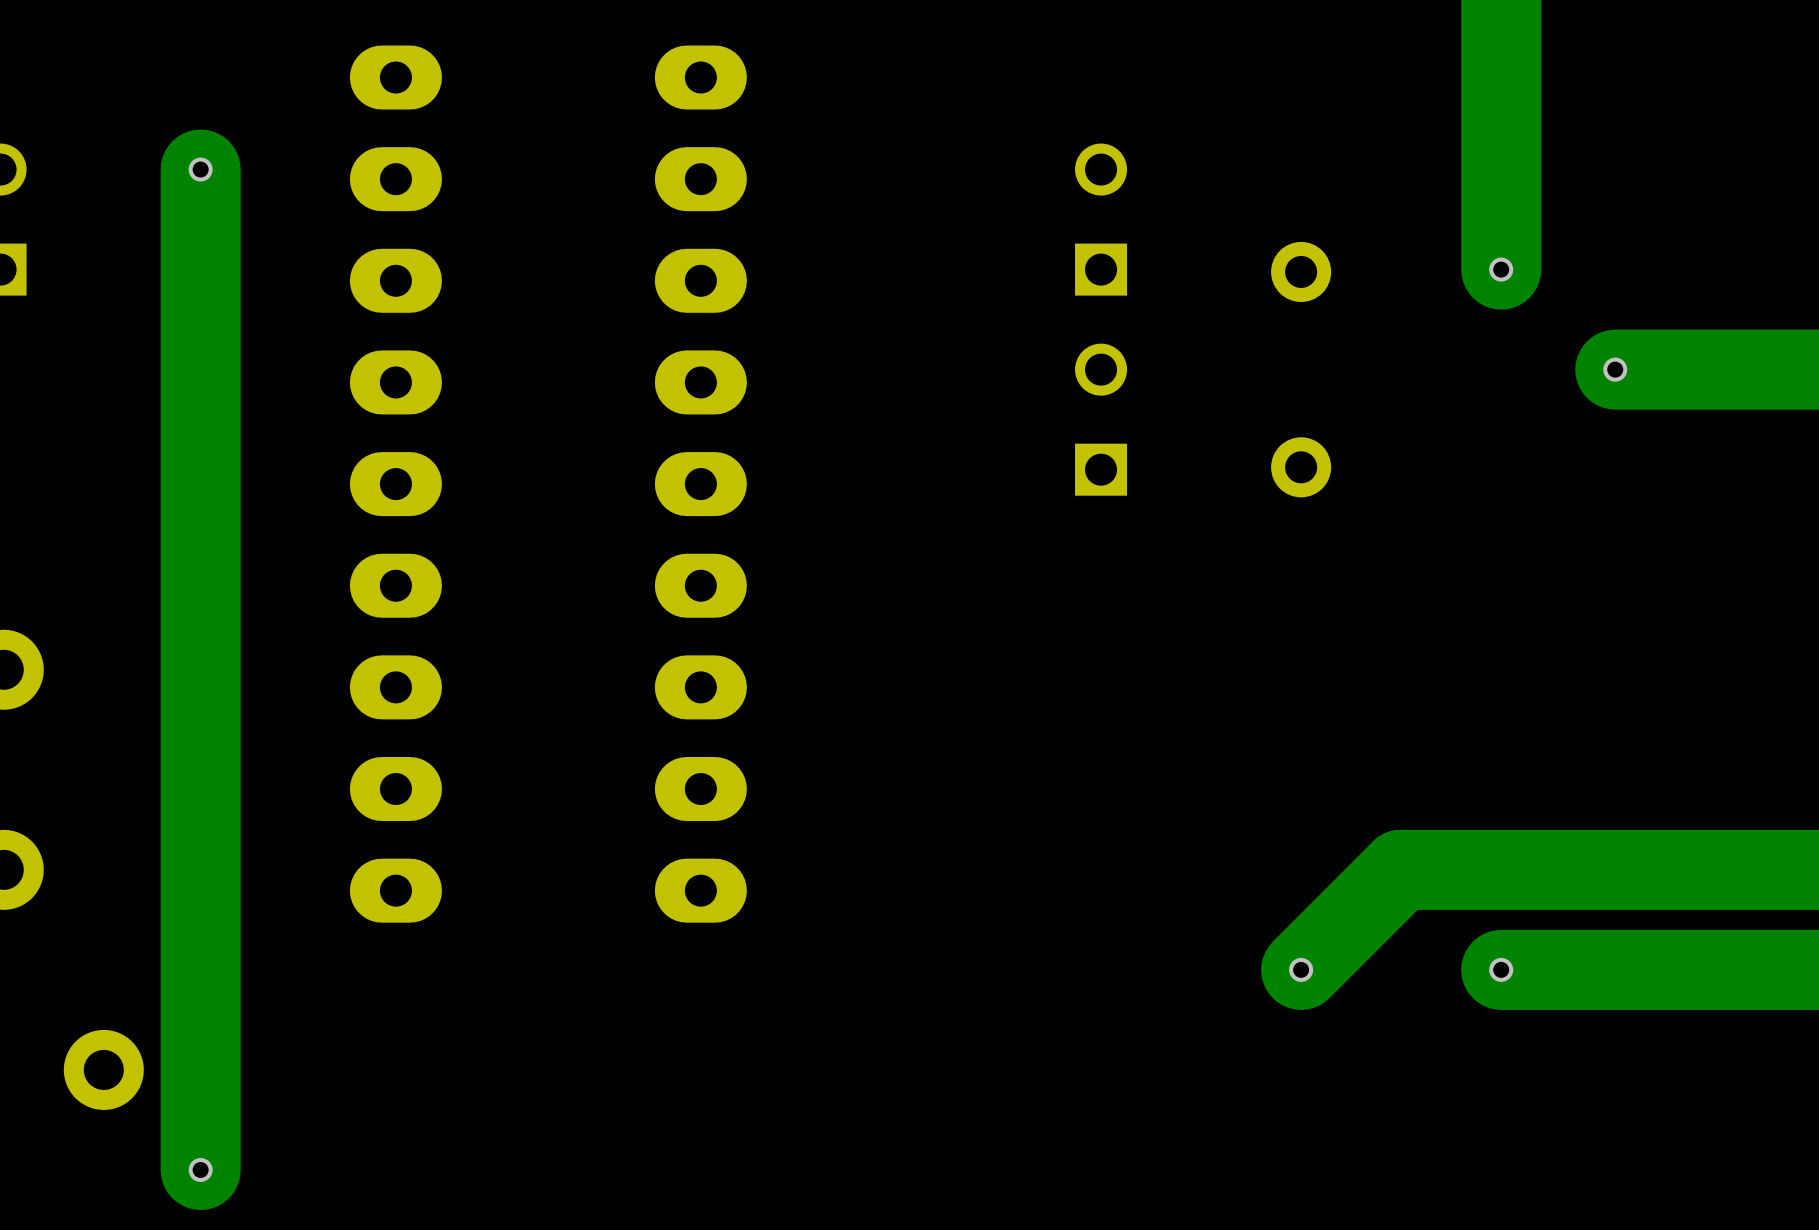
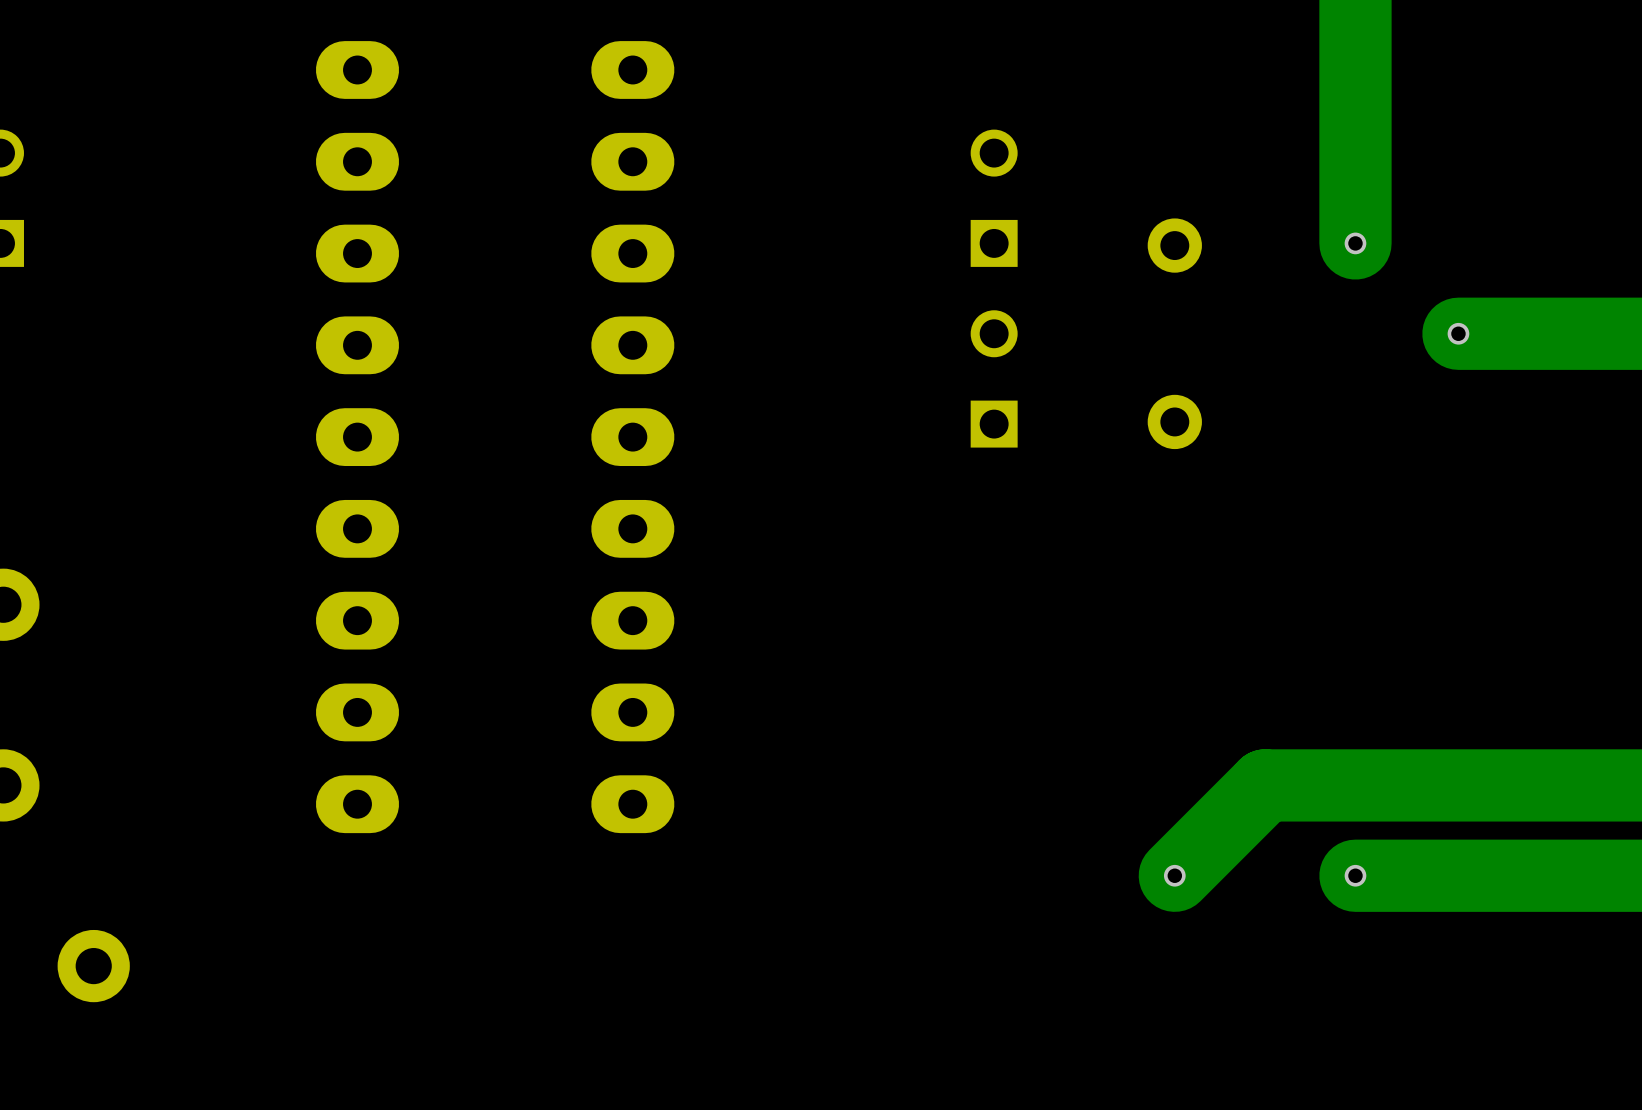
track: (200, 169) (200, 1169) -> none
via: (200, 169) -> none
via: (200, 1169) -> none

